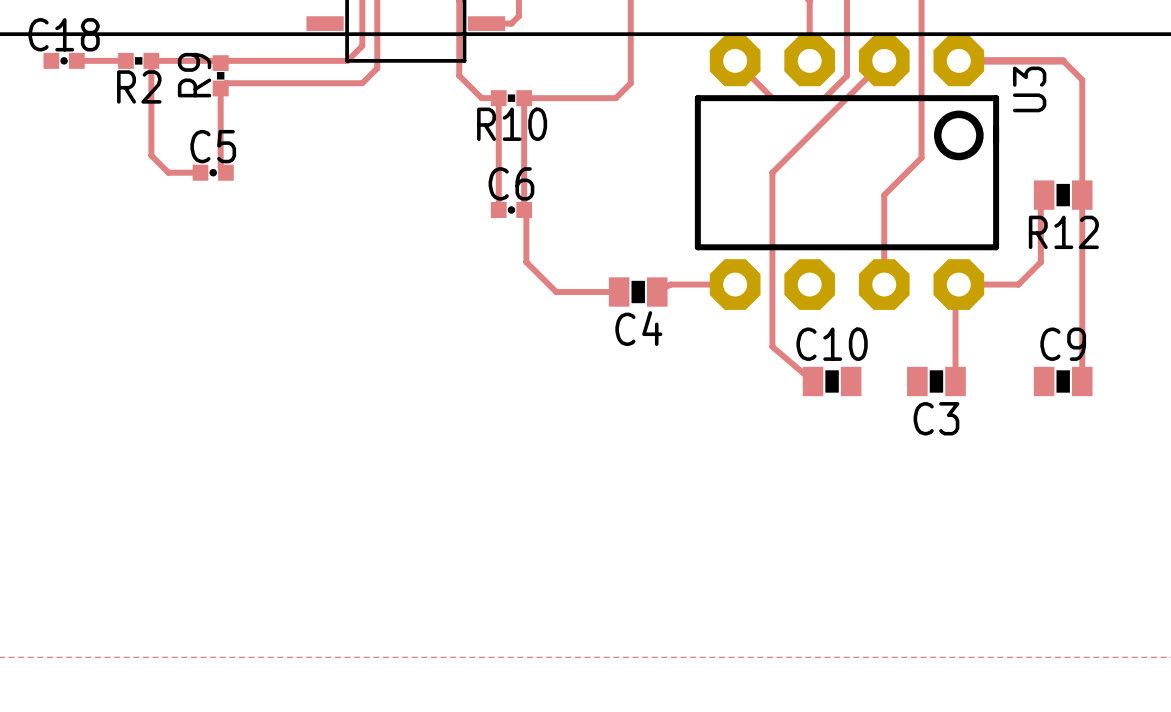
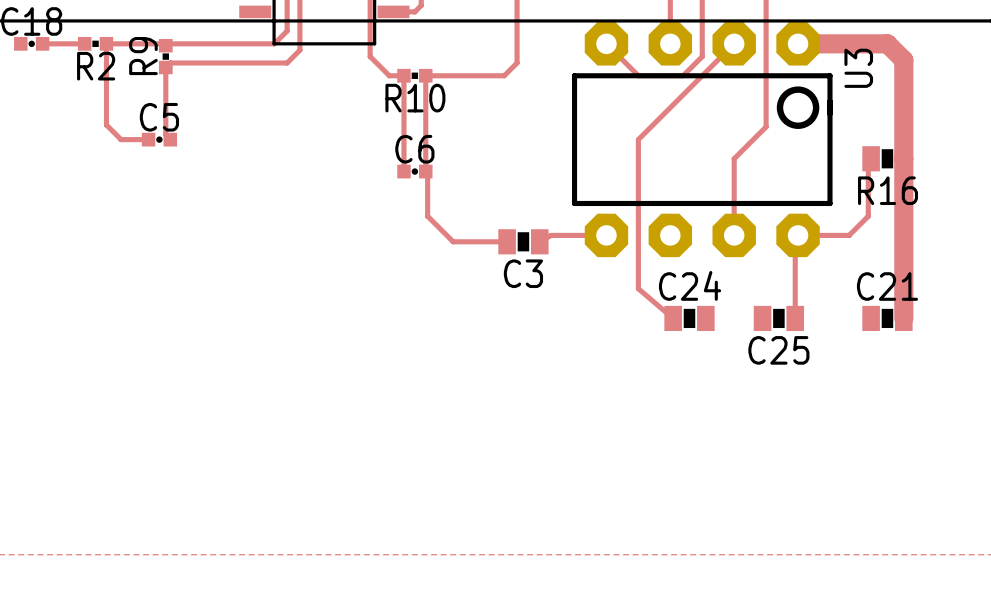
track width: thin (958, 60) (1063, 60) (1082, 79) (1082, 381) -> thick (798, 43) (887, 43) (903, 60) (903, 318)
R12 name: R12 (1063, 232) -> R16 (888, 190)
C4 name: C4 (638, 328) -> C3 (523, 273)
C10 name: C10 (832, 344) -> C24 (690, 285)
C9 name: C9 (1063, 344) -> C21 (887, 286)
C3 name: C3 (936, 418) -> C25 (778, 350)

